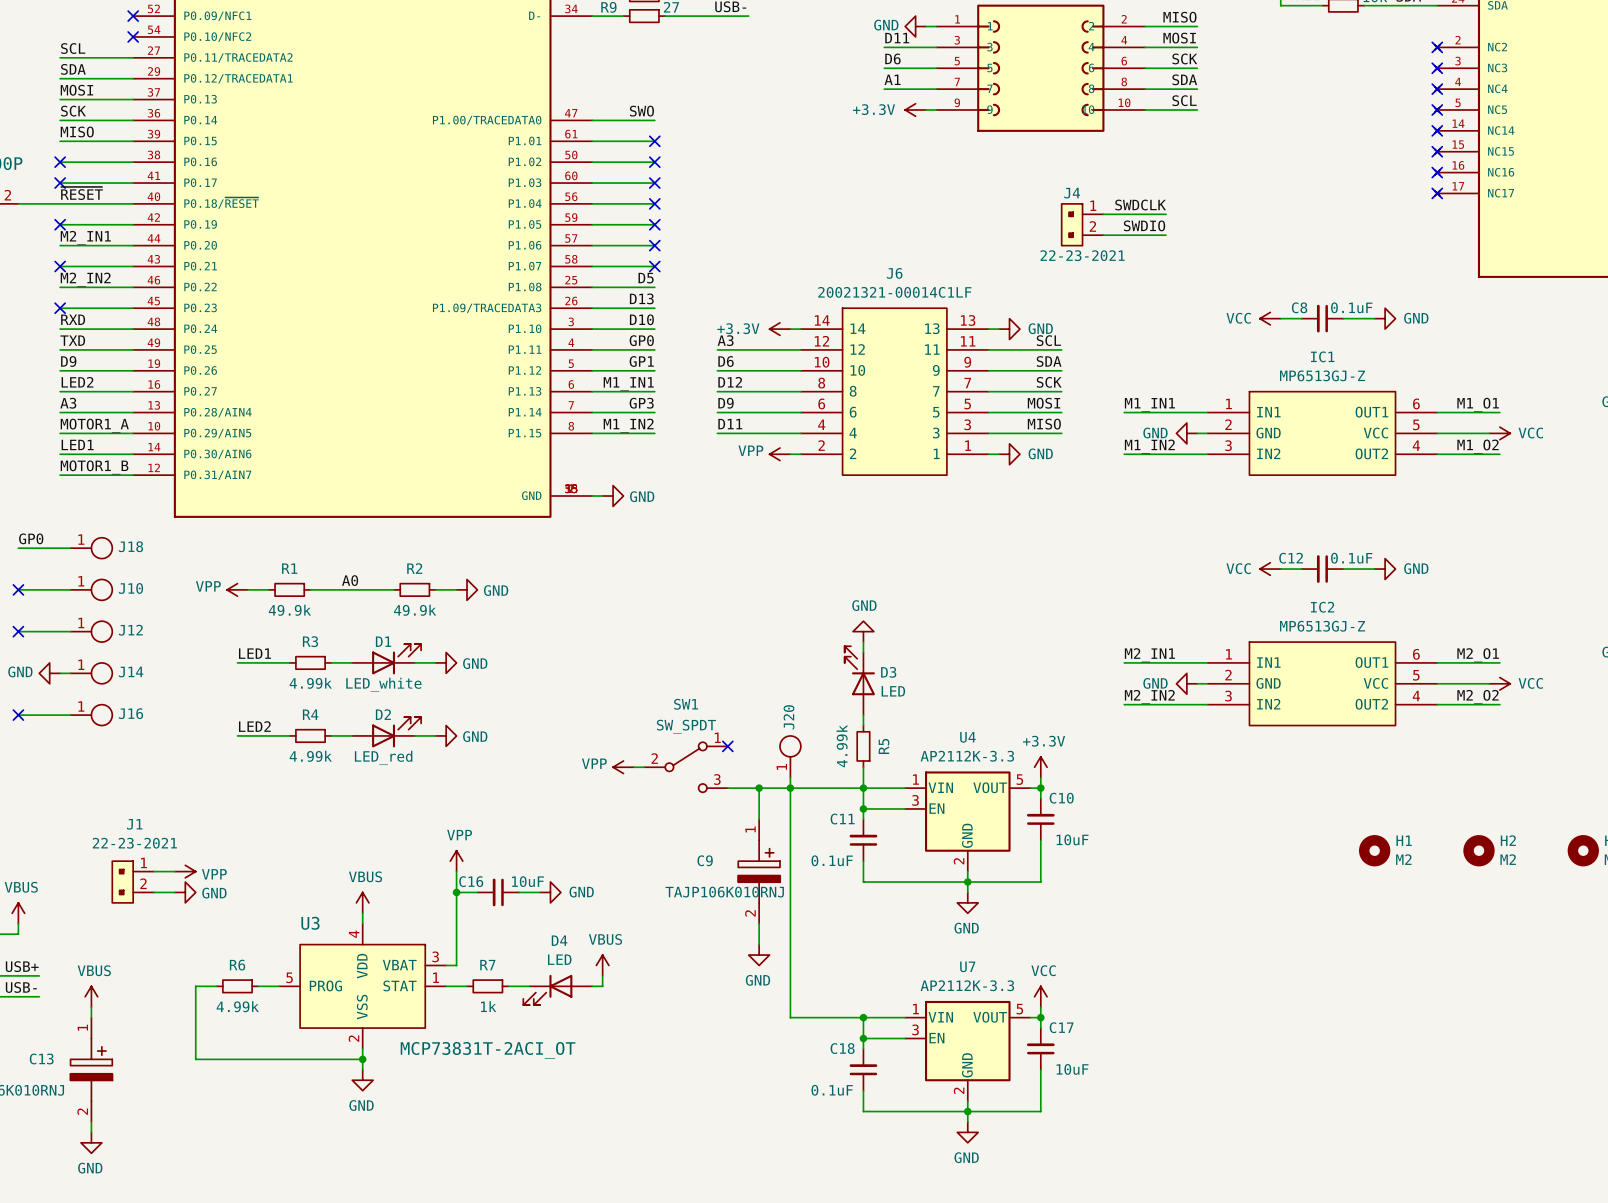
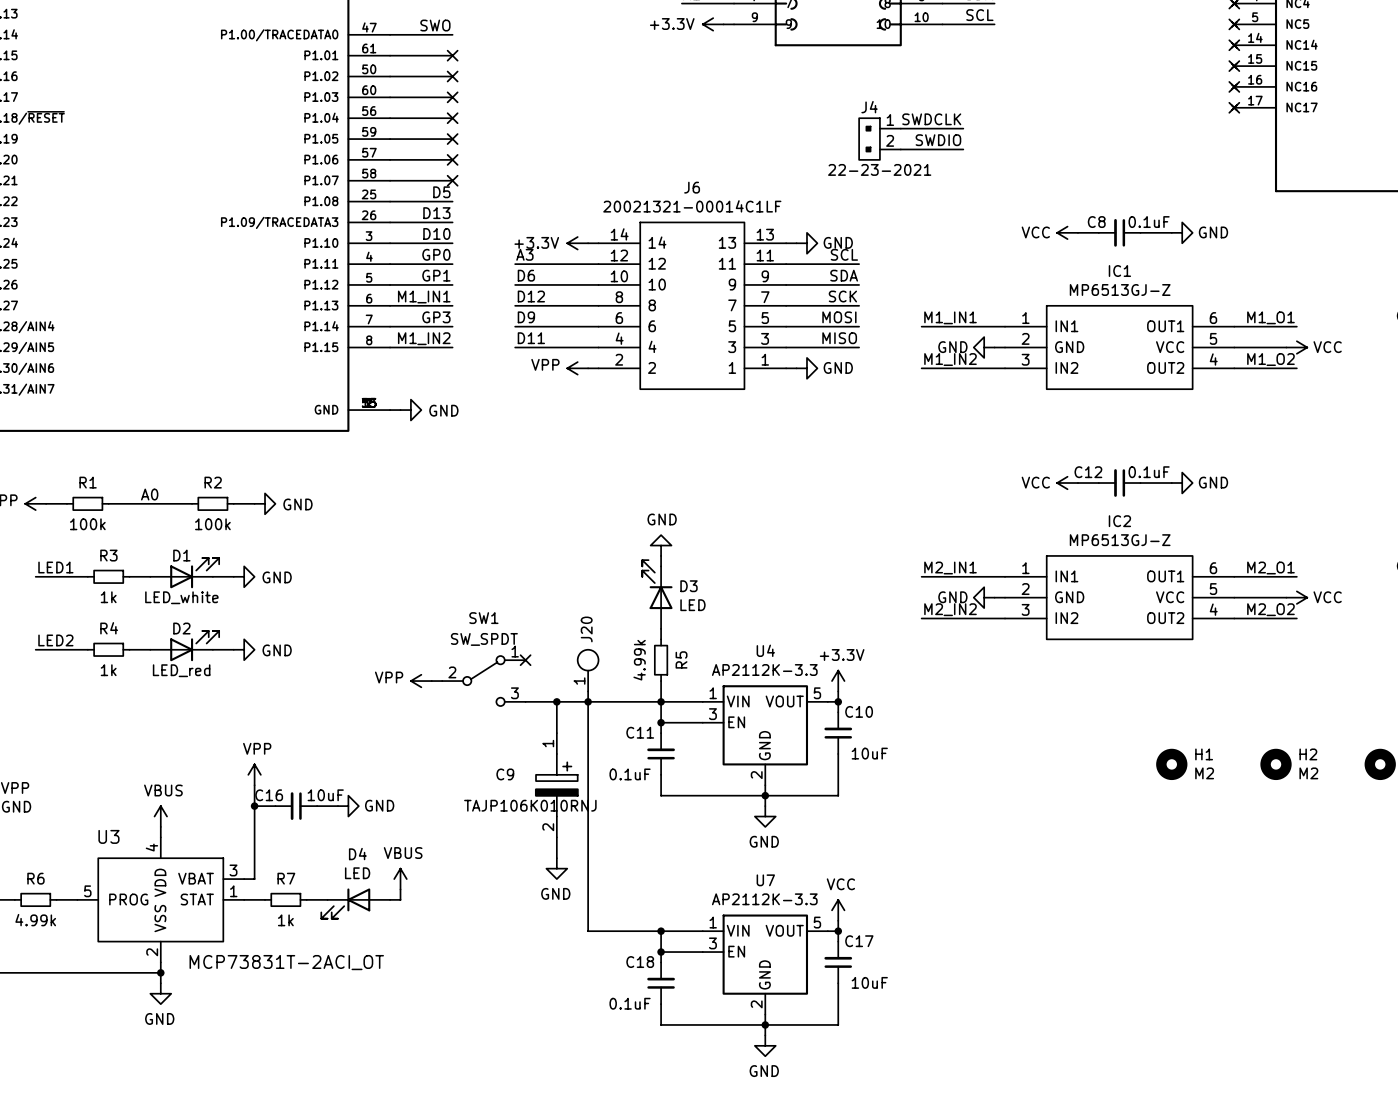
R1 value: 49.9k (289, 610) -> 100k (87, 524)
R2 value: 49.9k (415, 610) -> 100k (212, 524)
R3 value: 4.99k (310, 683) -> 1k (108, 597)
R4 value: 4.99k (310, 756) -> 1k (108, 670)

